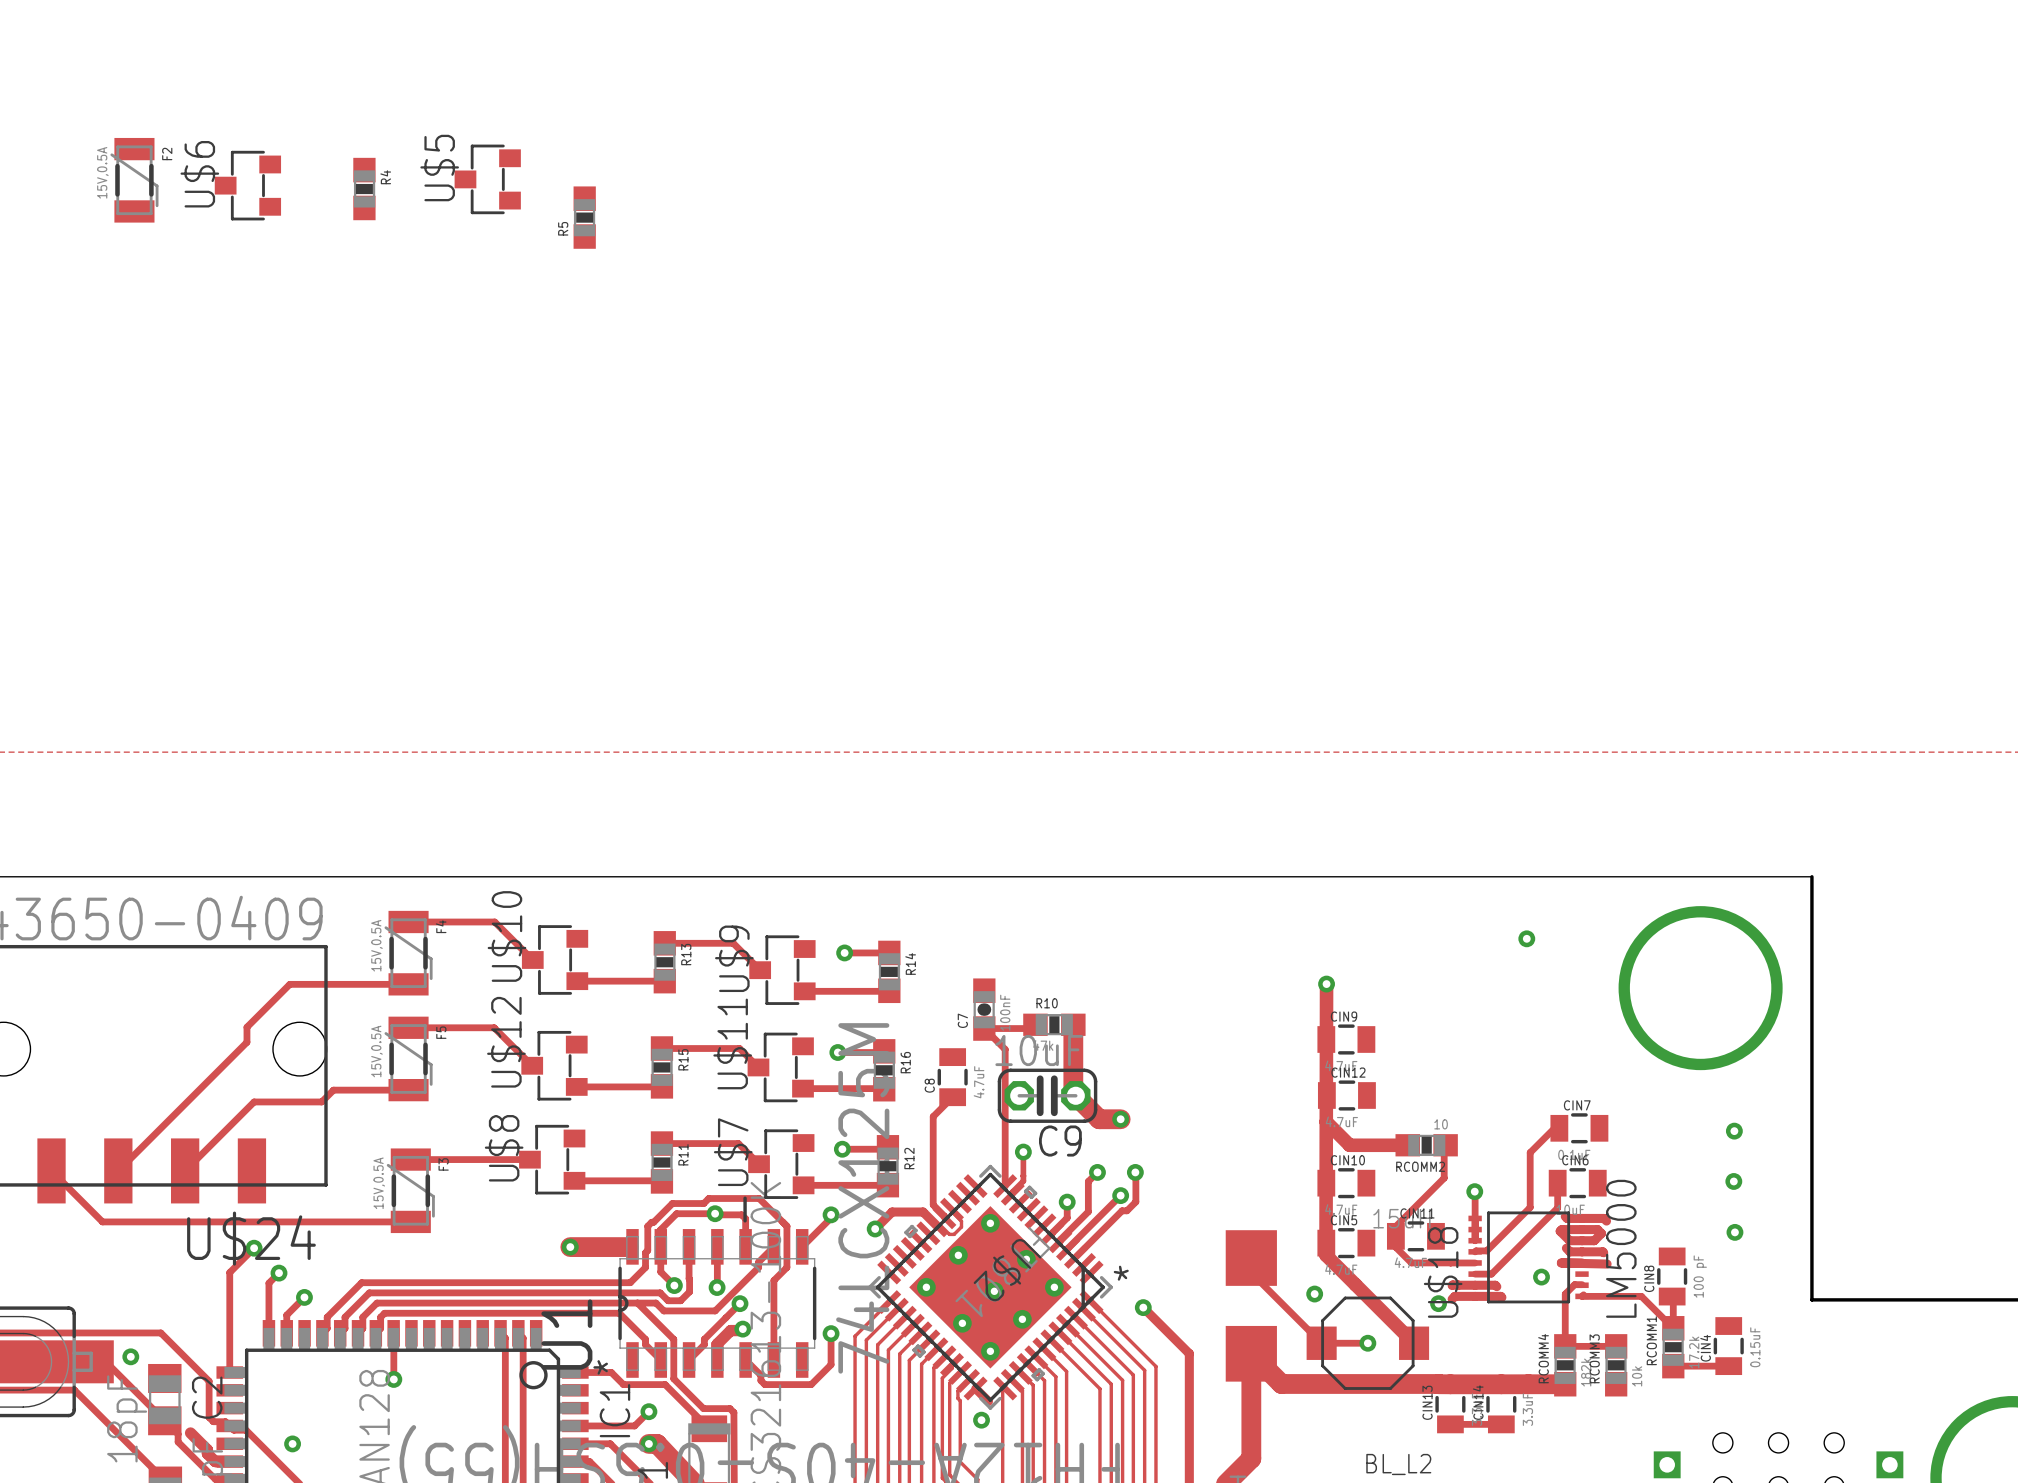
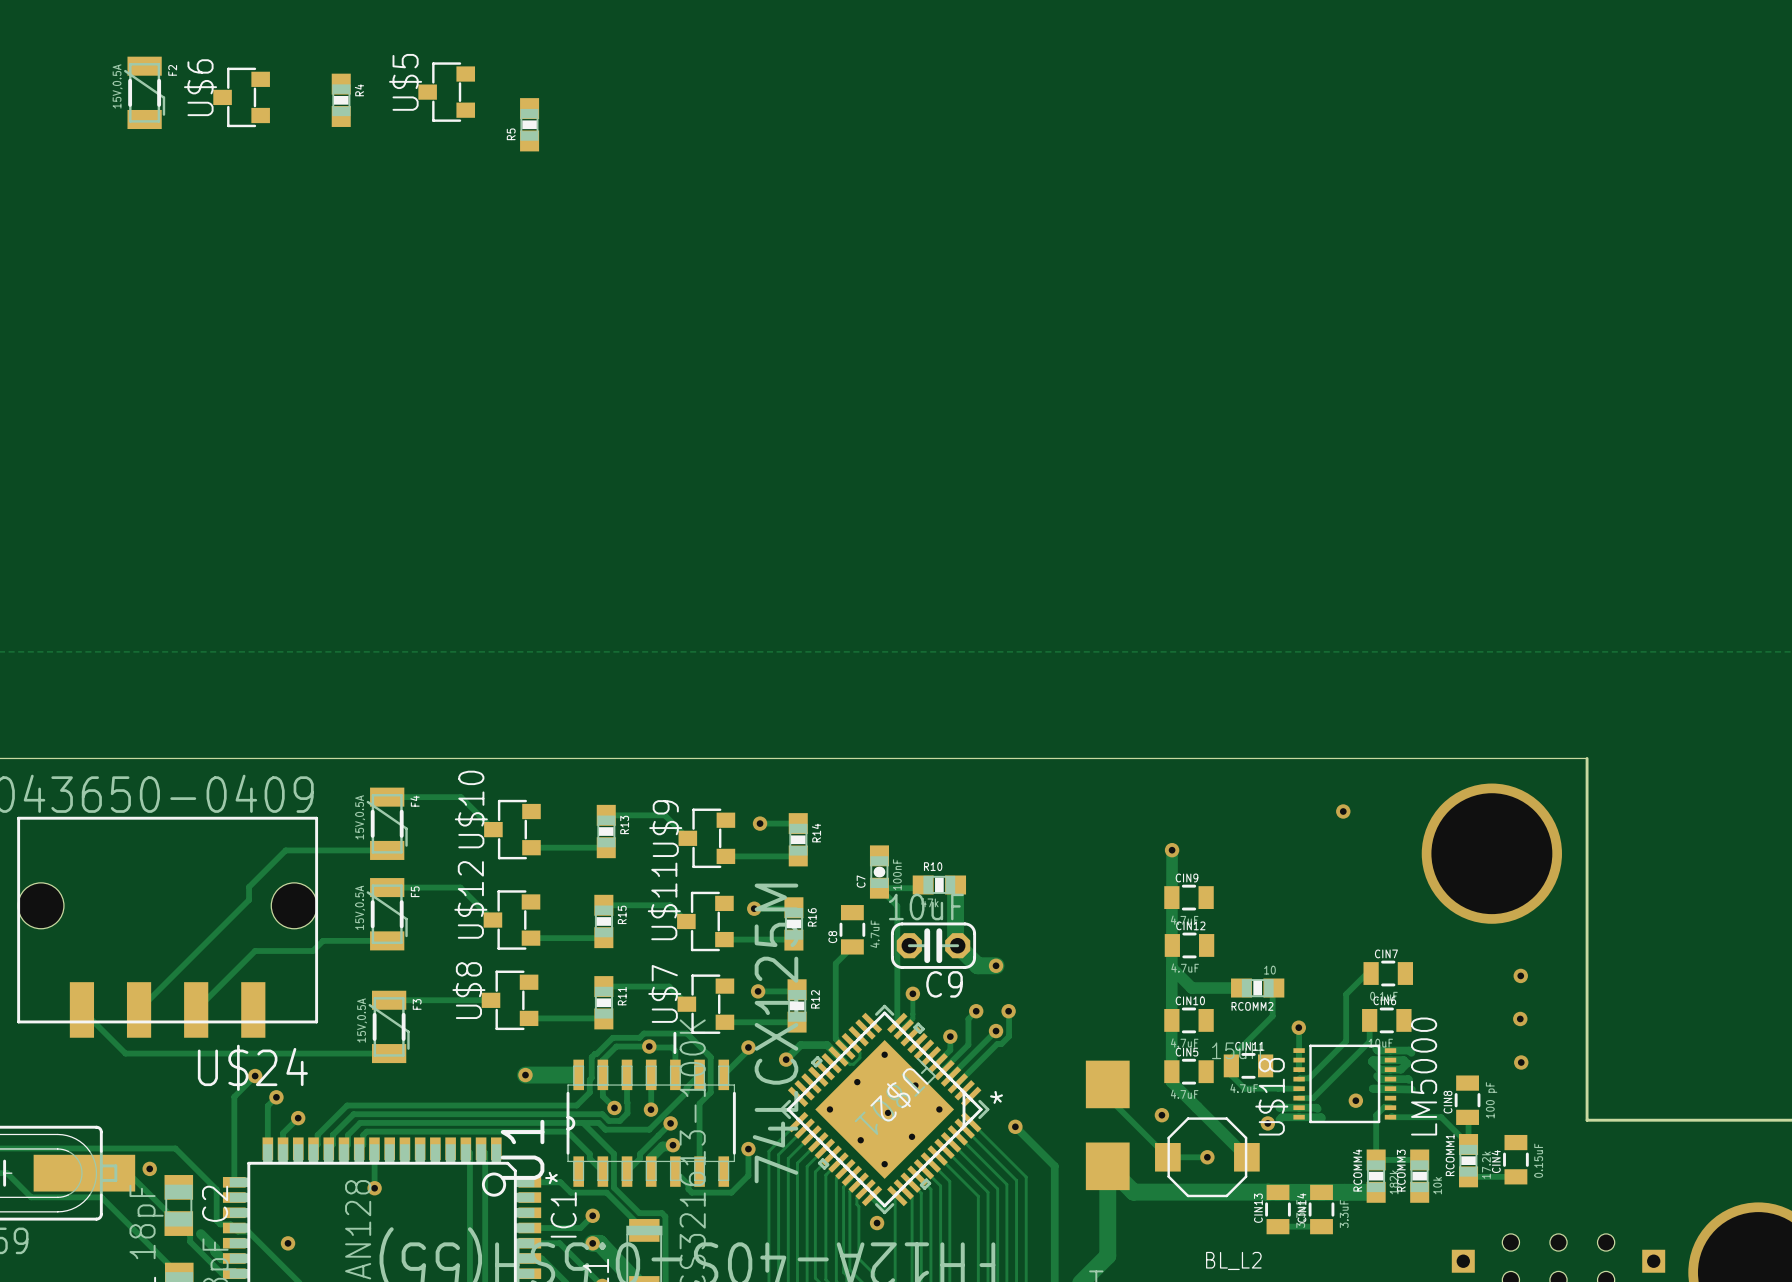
U$5 position: (487, 179) -> (446, 92)
F2 position: (134, 180) -> (144, 92)
U$6 position: (247, 185) -> (241, 97)
R4 position: (364, 189) -> (341, 100)
R5 position: (584, 217) -> (529, 124)

